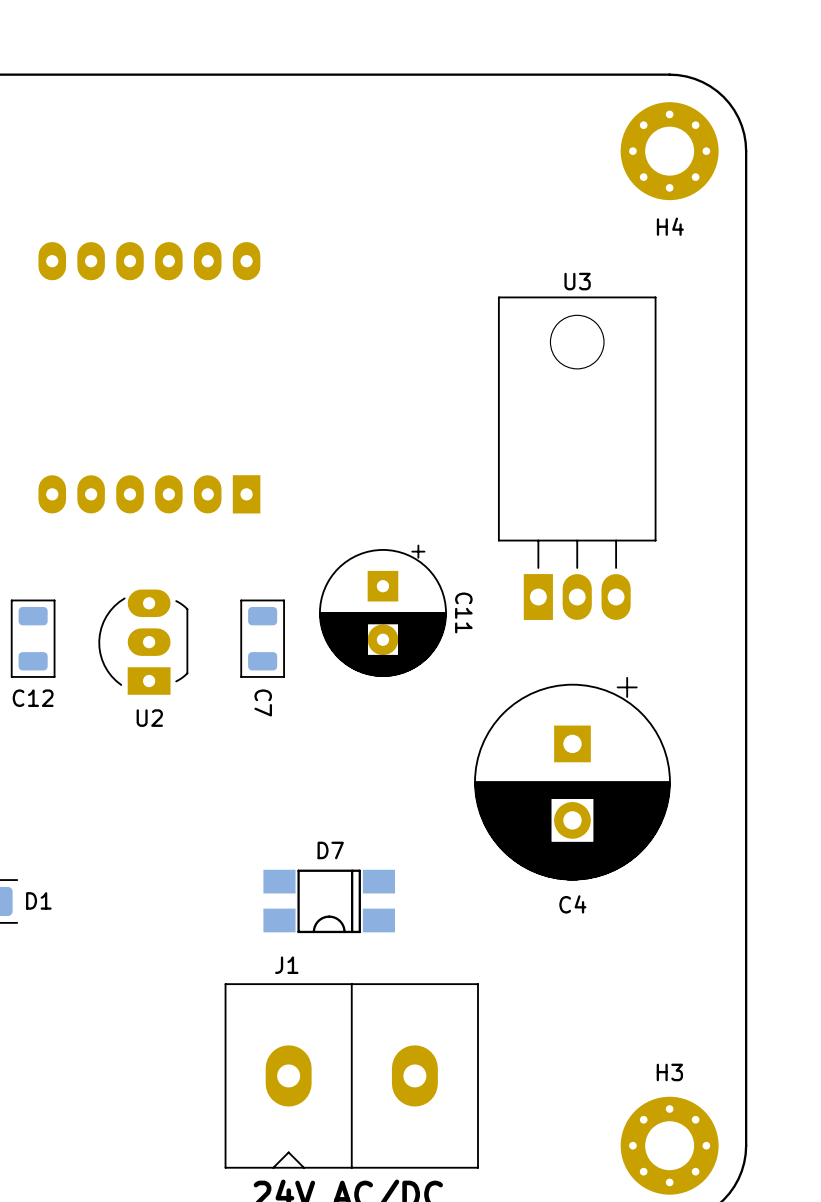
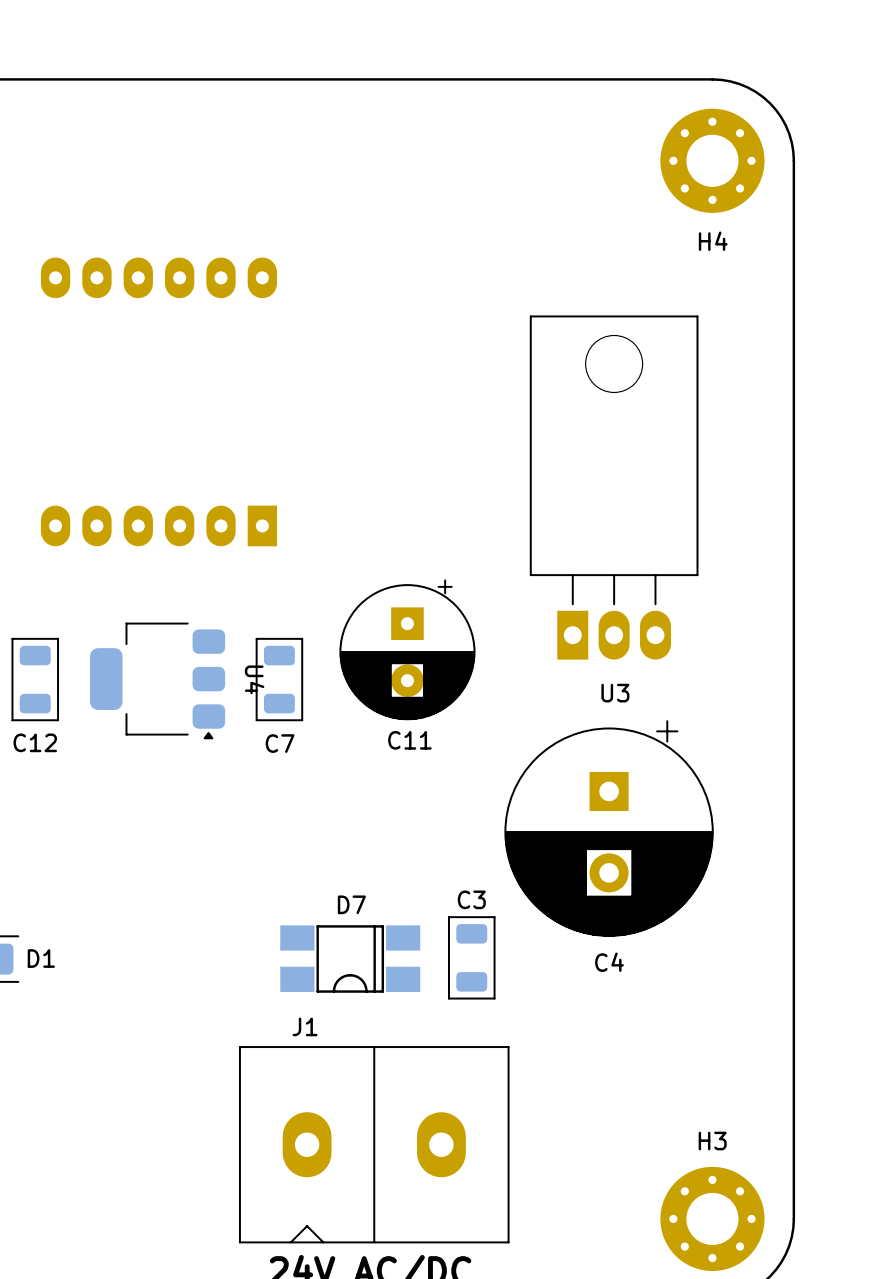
U3 name position: U3 (577, 281) -> U3 (615, 693)
C11 name rotation: 0° (463, 612) -> 90° counterclockwise (409, 740)
C11 name position: C11 (463, 612) -> C11 (409, 740)
U4: none -> (157, 680)
U2: (143, 642) -> none
C7 name rotation: 0° (263, 702) -> 90° counterclockwise (280, 743)
C3: none -> (471, 957)

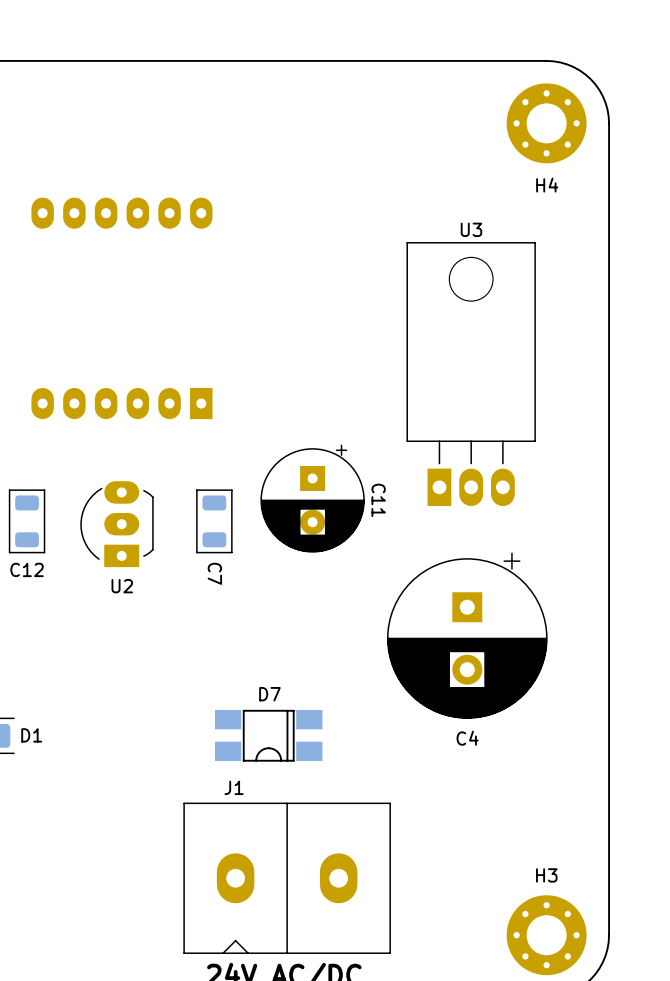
U4: (157, 680) -> none
U2: none -> (116, 524)
U3 name position: U3 (615, 693) -> U3 (471, 229)
C11 name rotation: 0° (409, 740) -> 90° clockwise (378, 500)
C11 name position: C11 (409, 740) -> C11 (378, 500)
C7 name rotation: 0° (280, 743) -> 90° clockwise (214, 573)
C3: (471, 957) -> none

